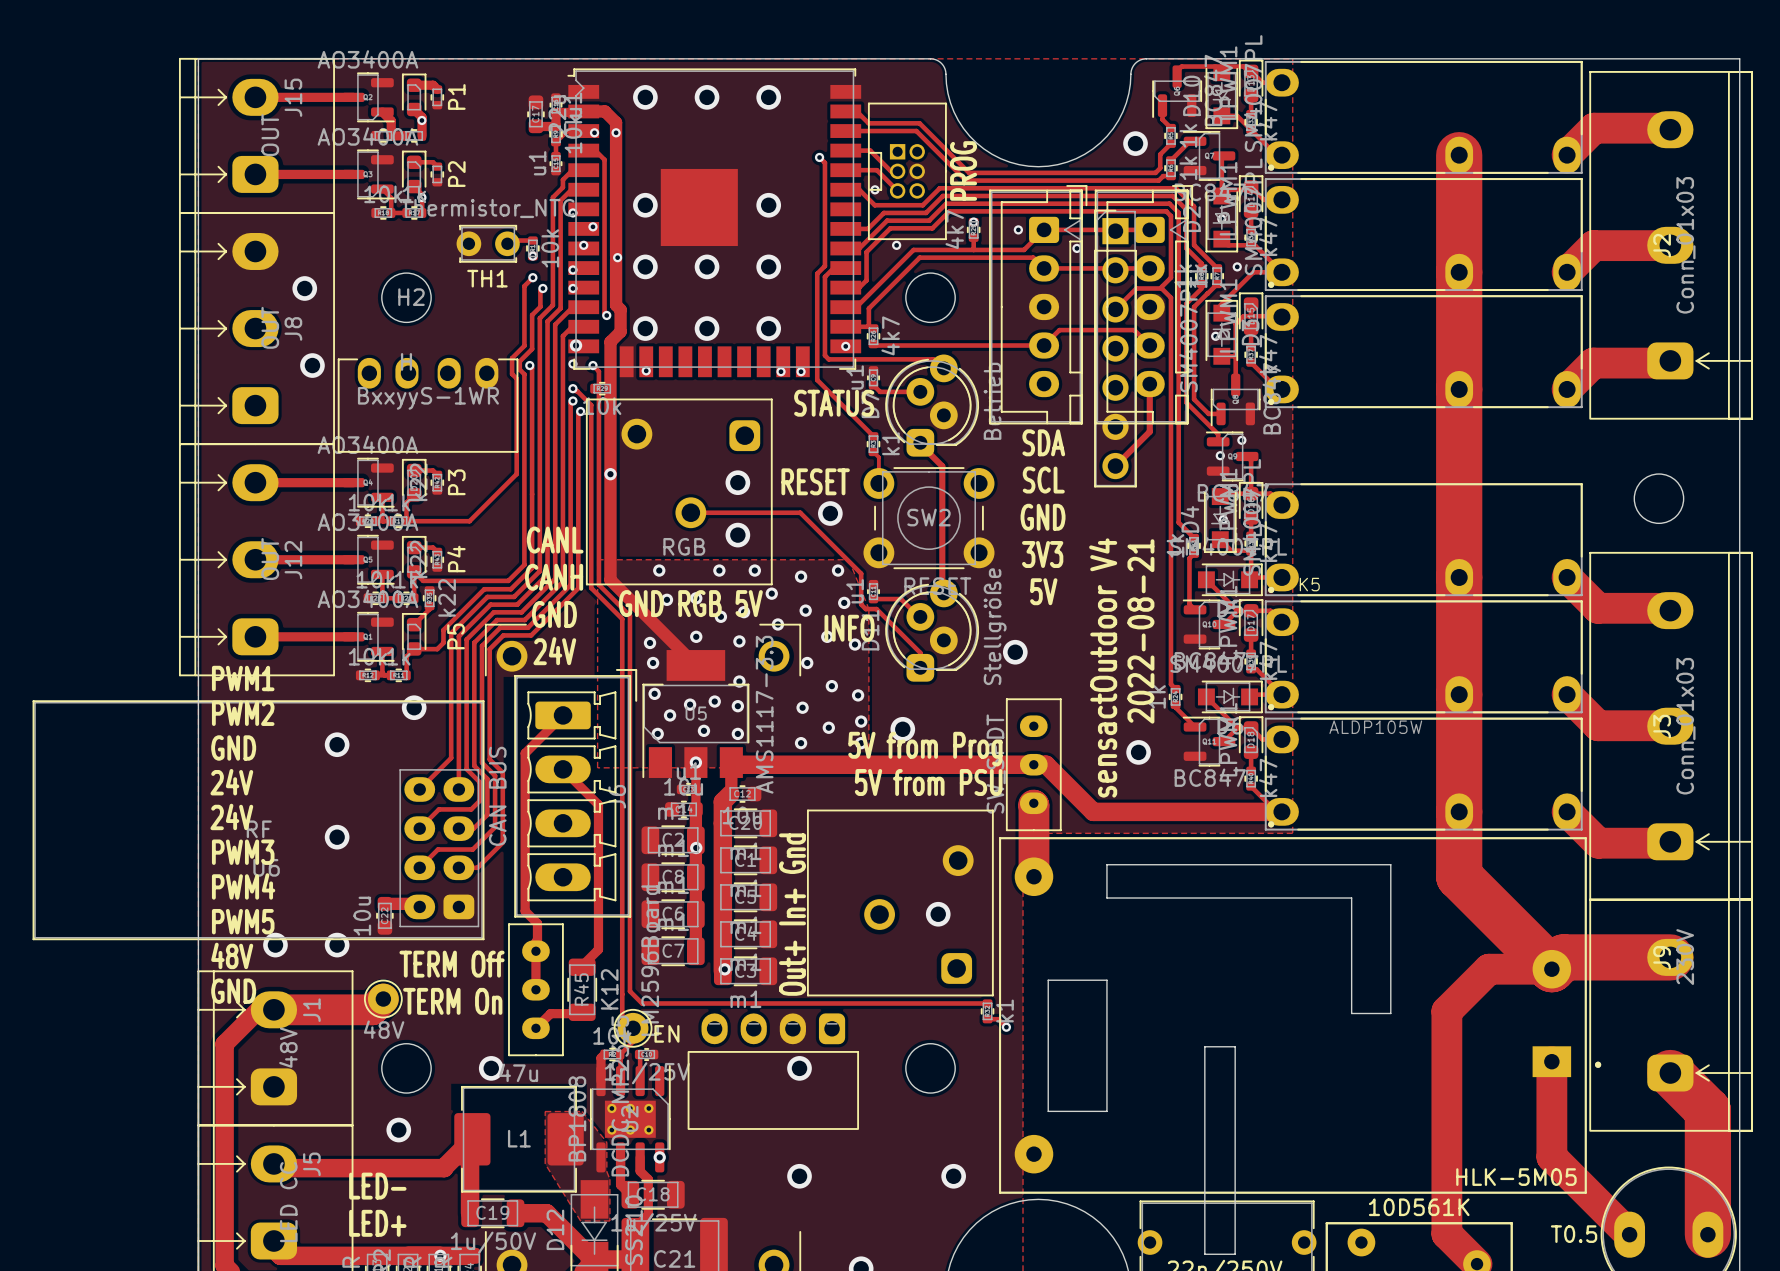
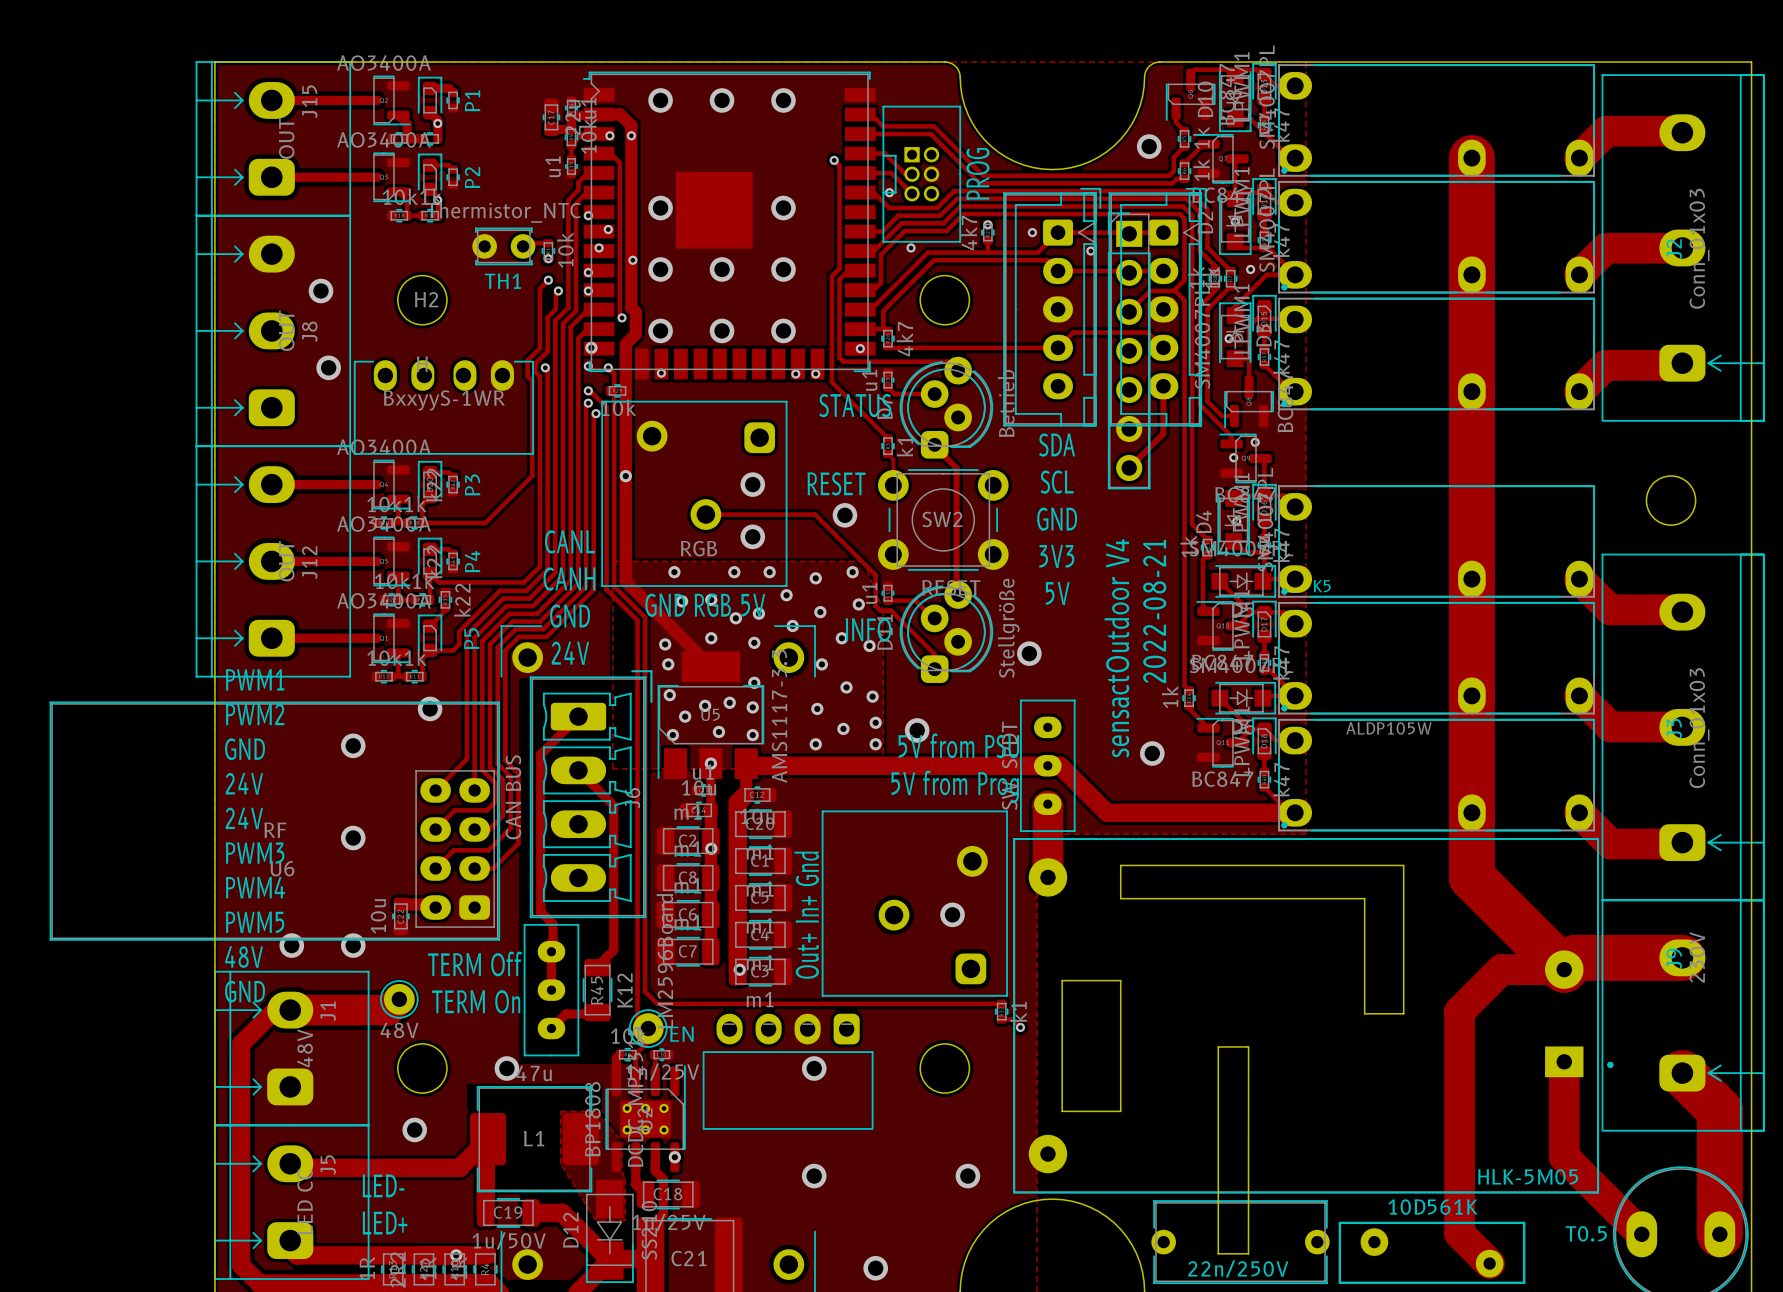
text: 5V from Prog (925, 749) -> 5V from PSU (958, 745)
text: 5V from PSU (928, 782) -> 5V from Prog (955, 786)

